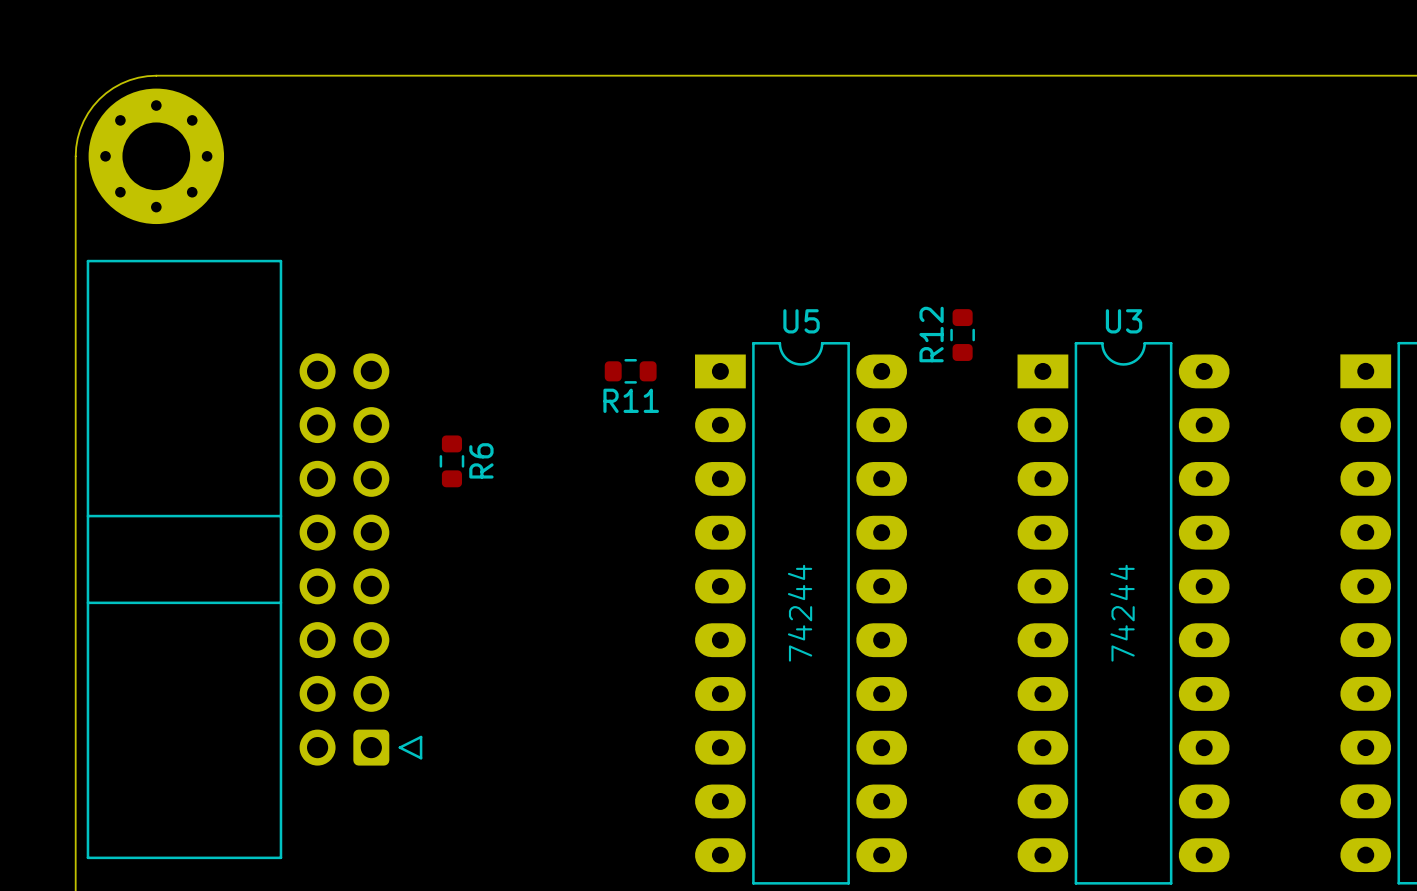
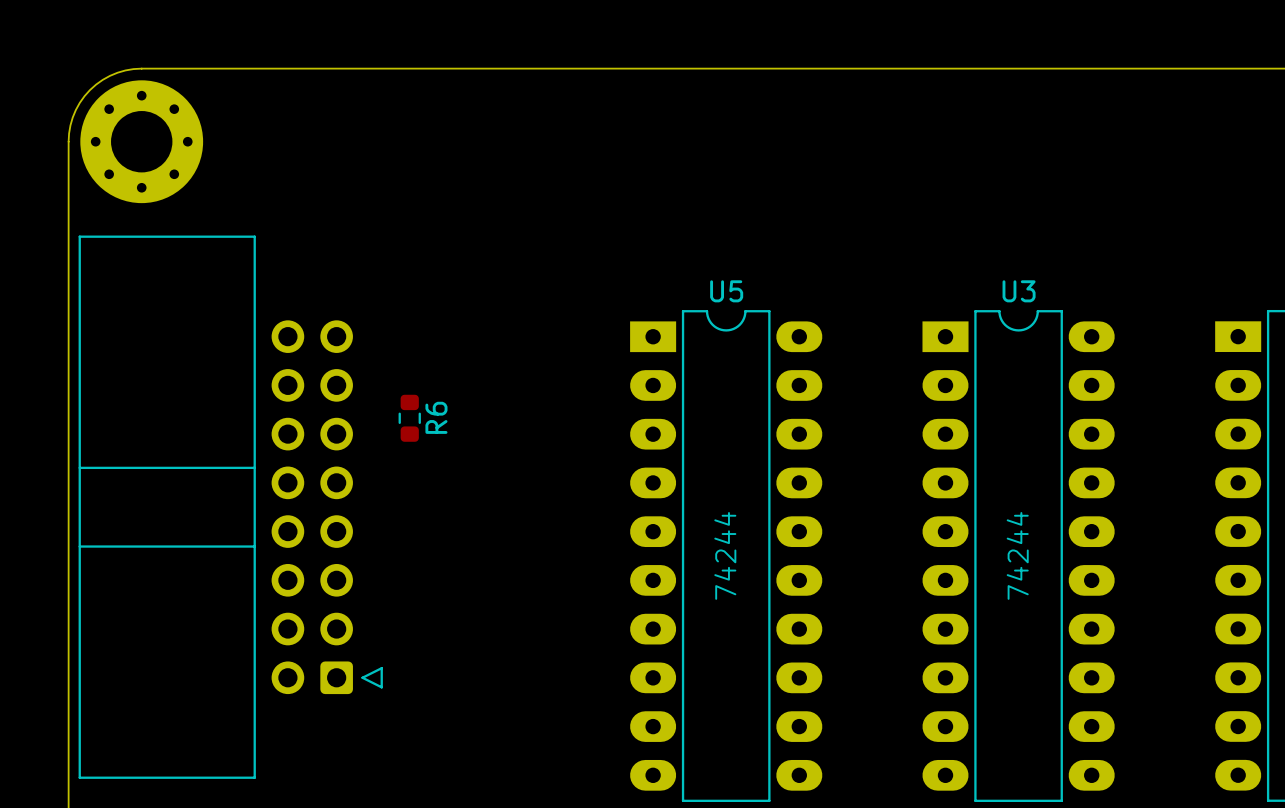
R12: (962, 335) -> none
R11: (630, 371) -> none

